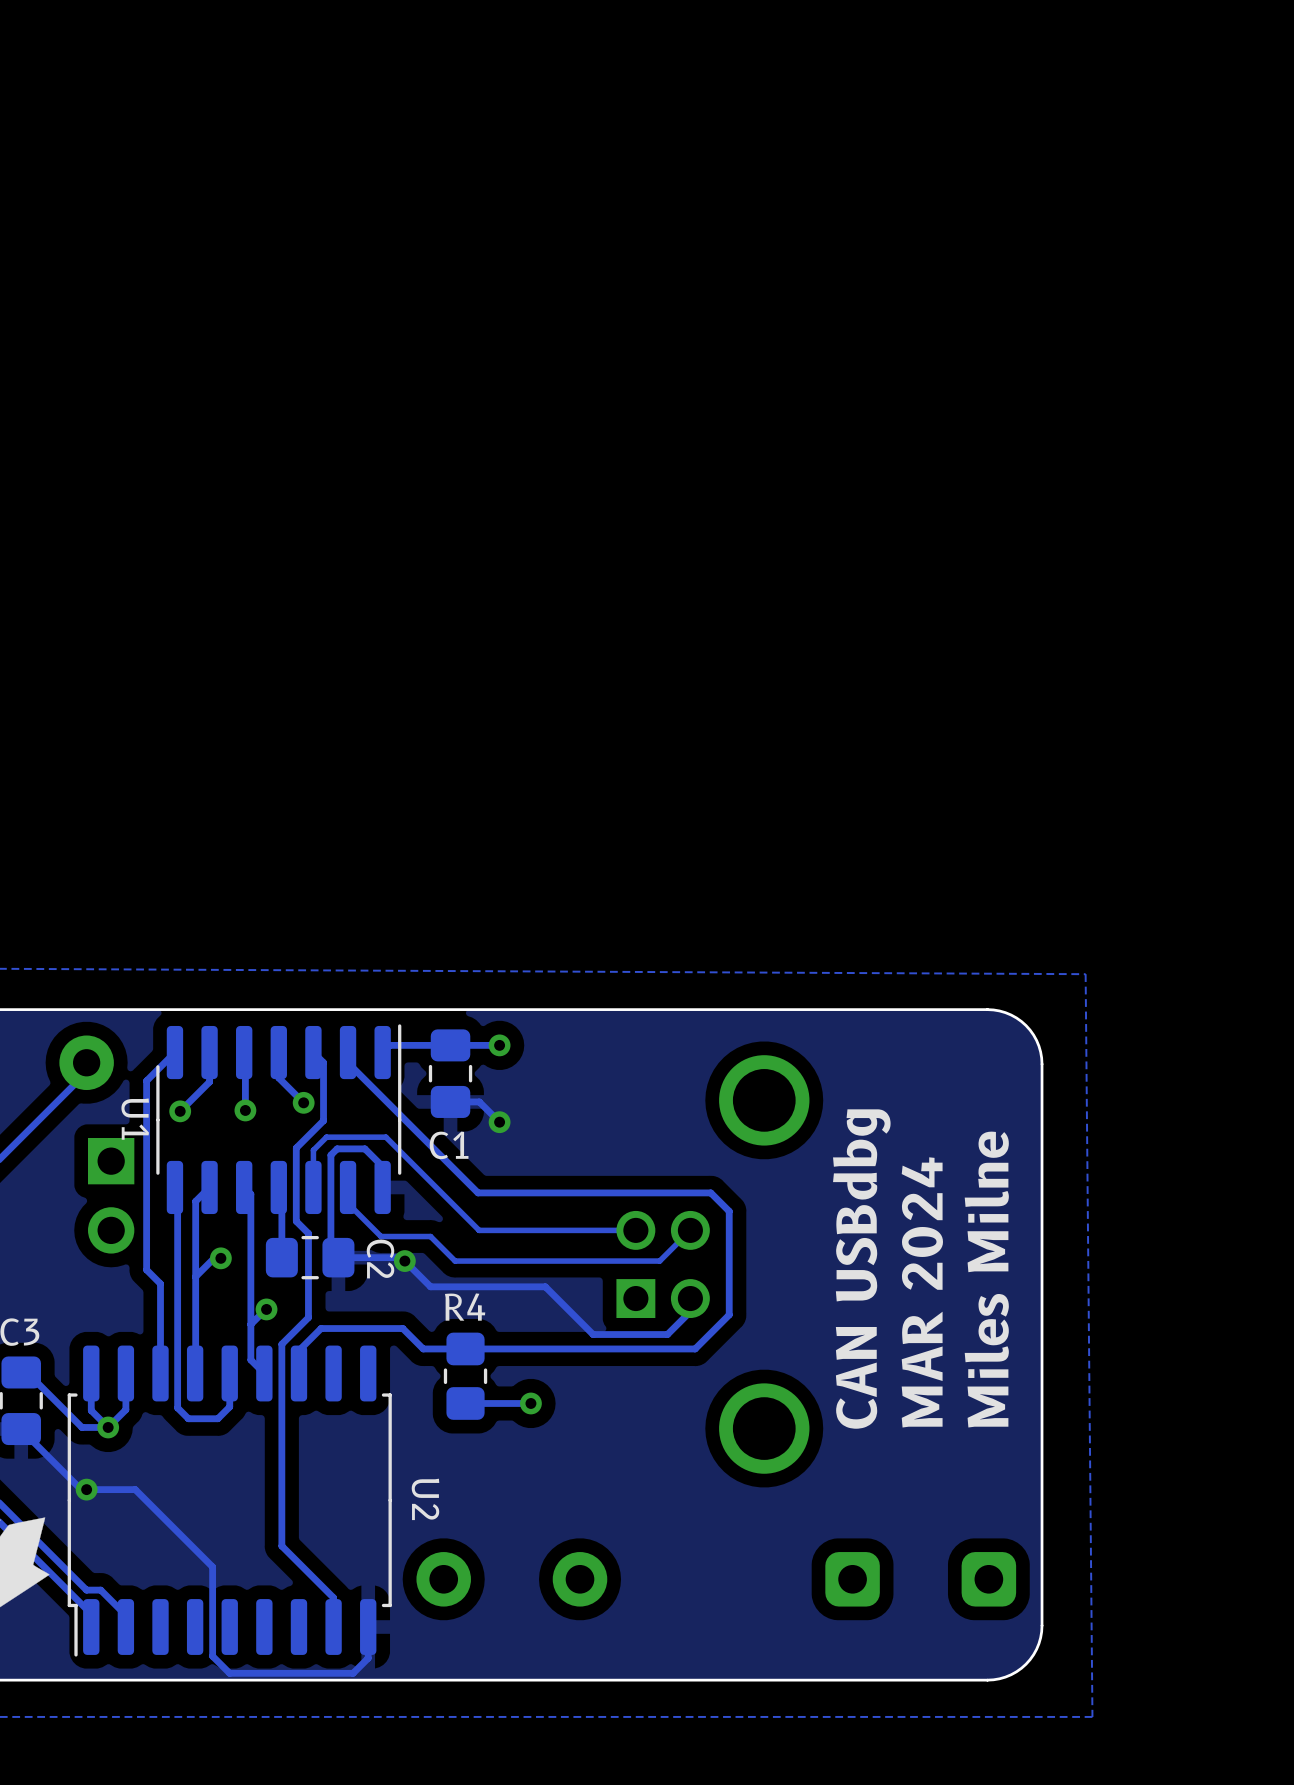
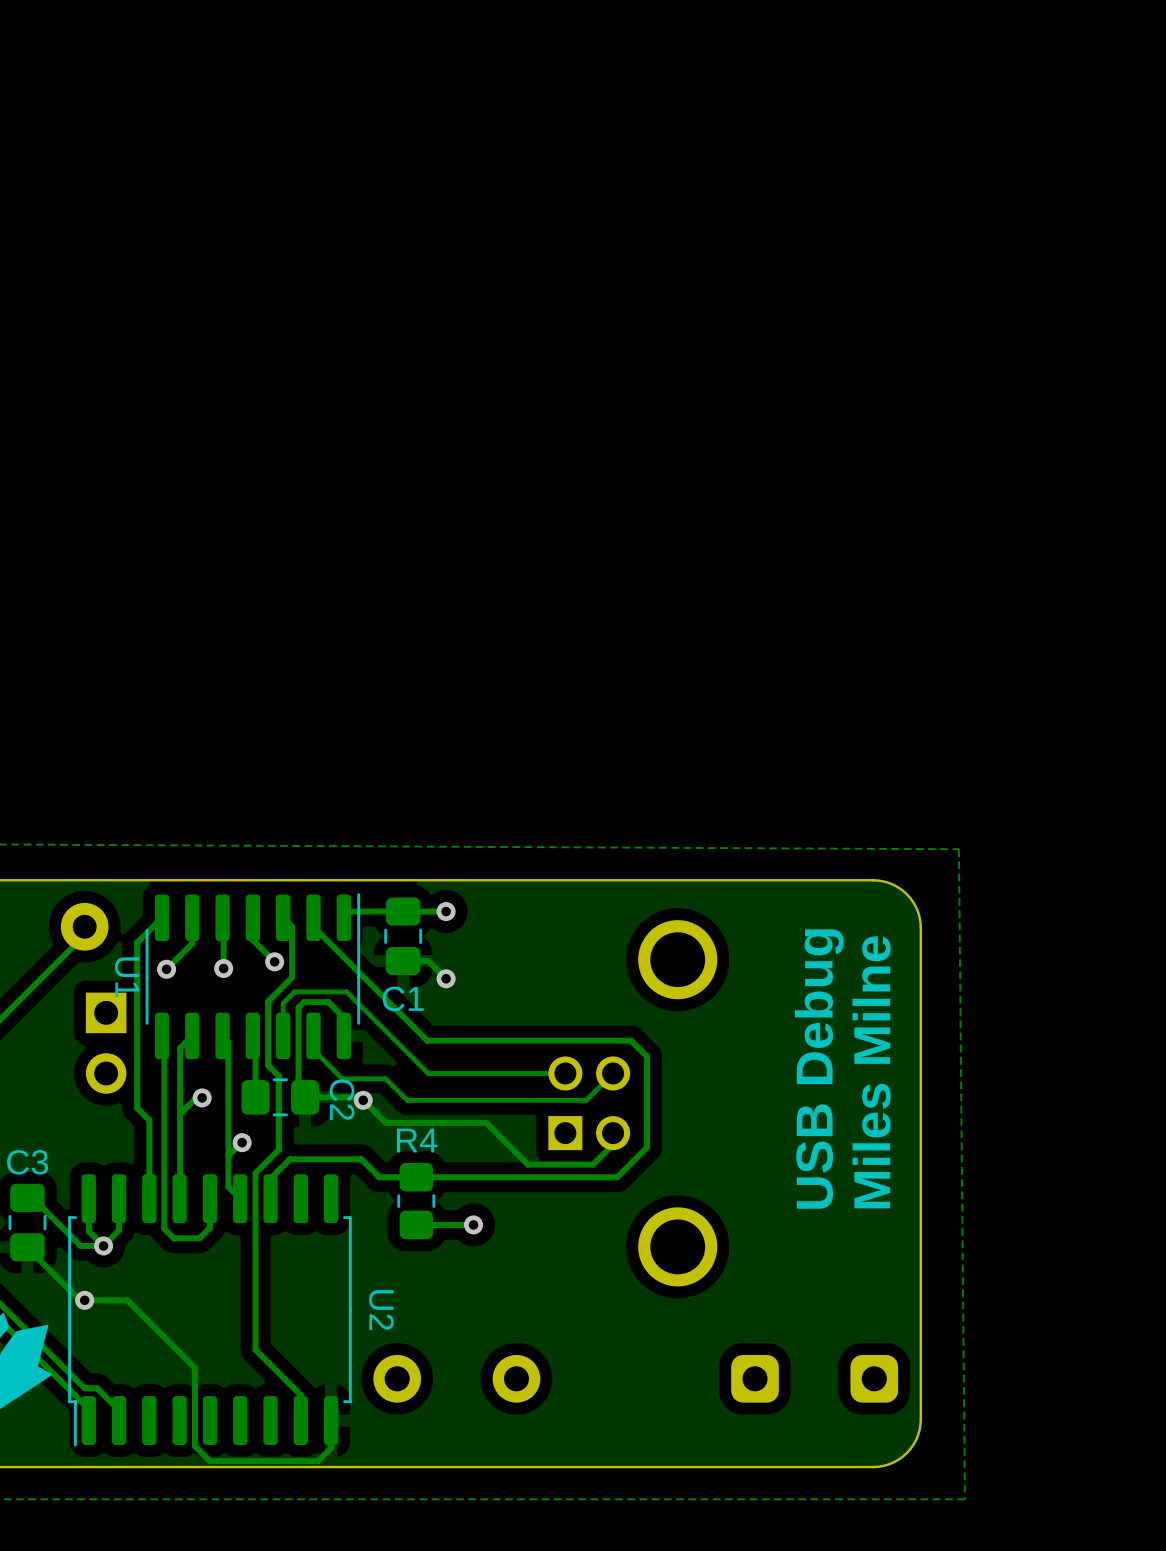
text: none -> USB Debug (819, 1068)
text: CAN USBdbg (861, 1269) -> none
text position: Miles Milne (986, 1279) -> Miles Milne (871, 1072)
text: MAR 2024 (922, 1292) -> none

